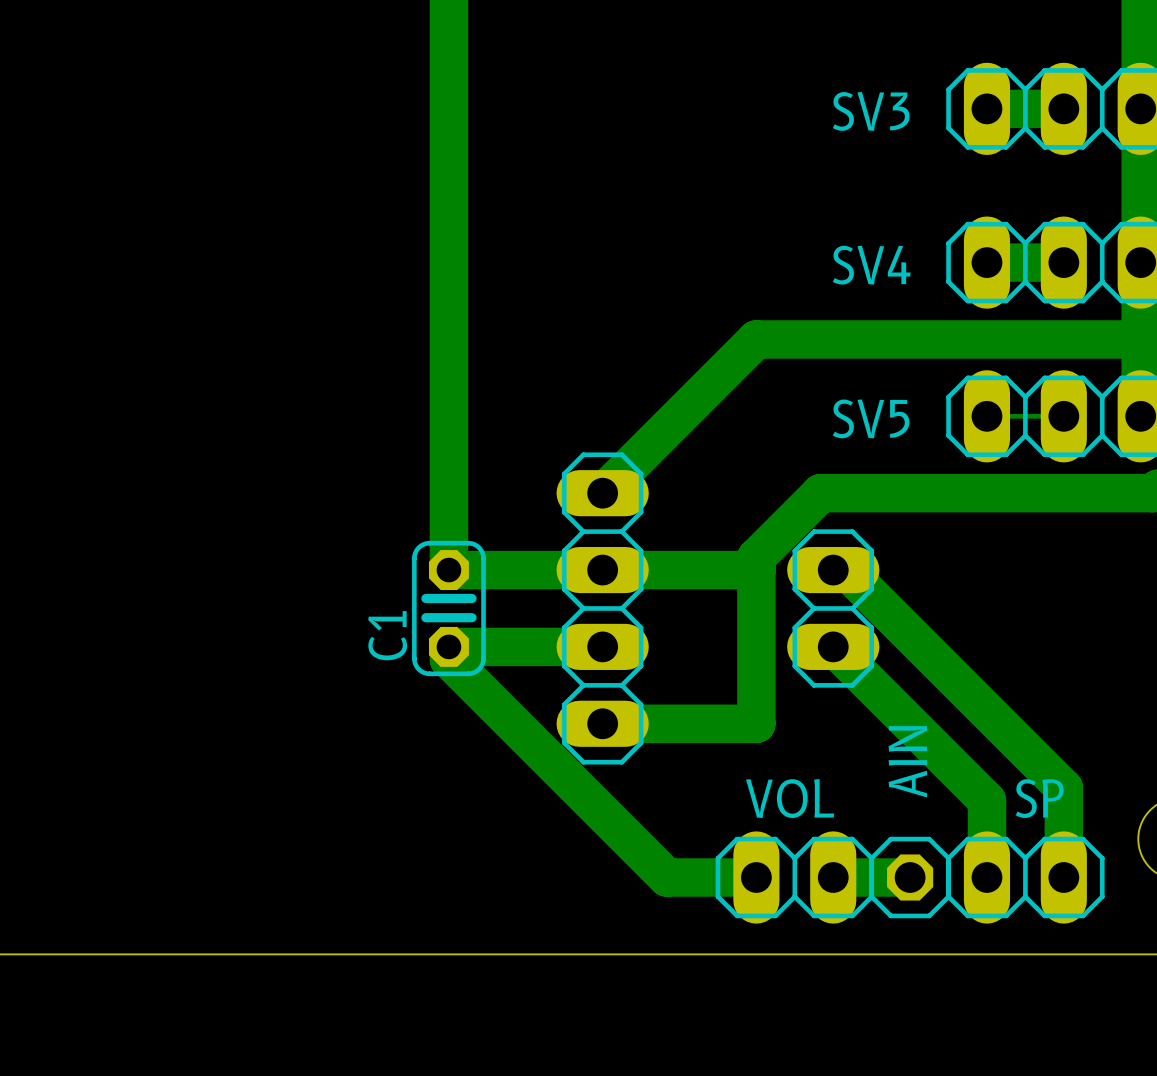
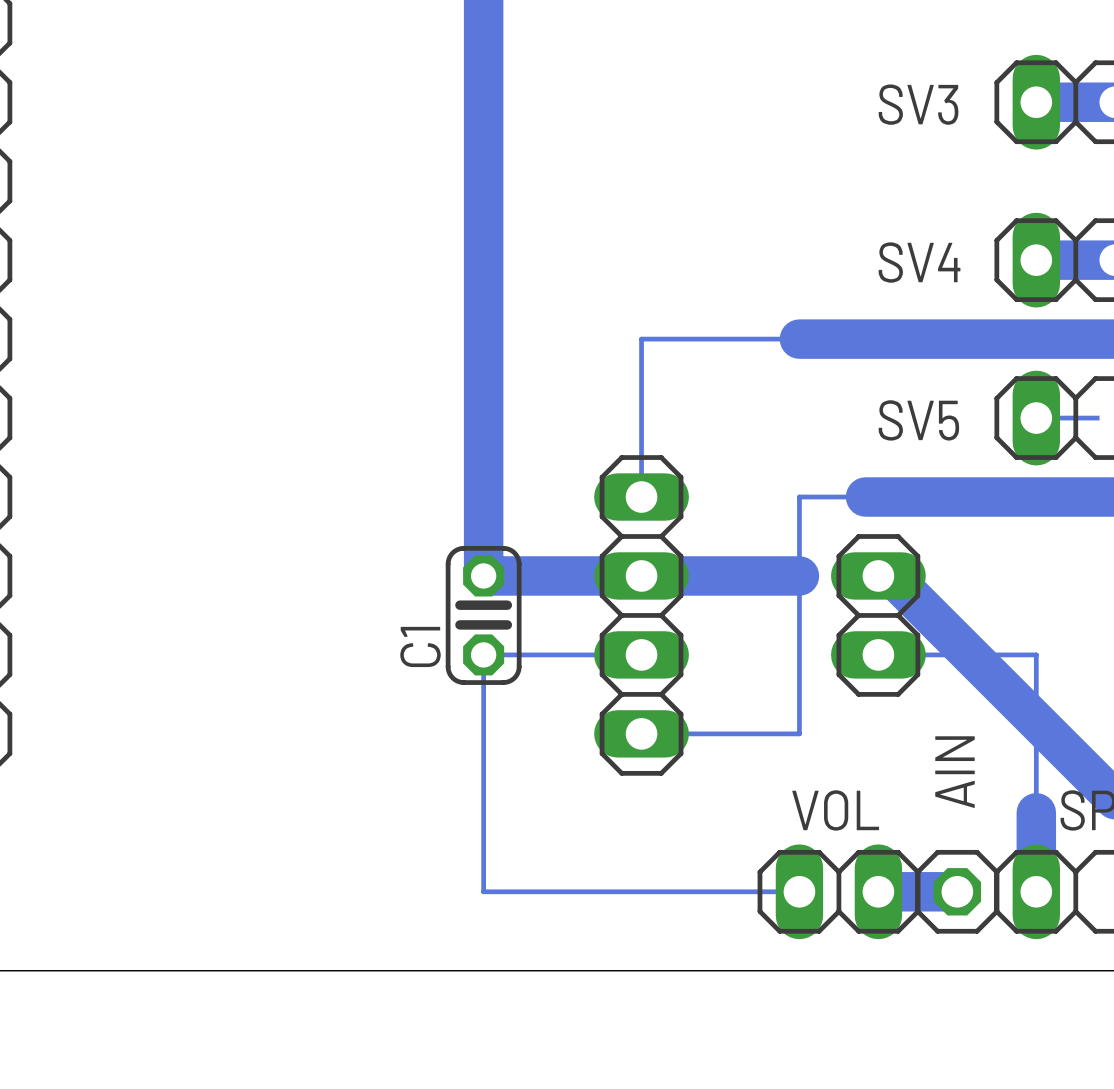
bottom track: (756, 339) (602, 493) -> (799, 339) (641, 339) (641, 497)
bottom track: (820, 493) (756, 557) -> (865, 497) (799, 497) (799, 563)
bottom track width: thick (756, 557) (756, 723) (602, 723) -> thin (799, 563) (799, 733) (641, 733)
bottom track width: thick (602, 646) (448, 646) (448, 659) -> thin (641, 654) (483, 654) (483, 667)
bottom track: (833, 646) (986, 800) -> (878, 654) (1036, 654) (1036, 812)
bottom track: (448, 659) (667, 877) -> (483, 667) (483, 891) (707, 891)
bottom track width: thick (667, 877) (756, 877) -> thin (707, 891) (799, 891)

